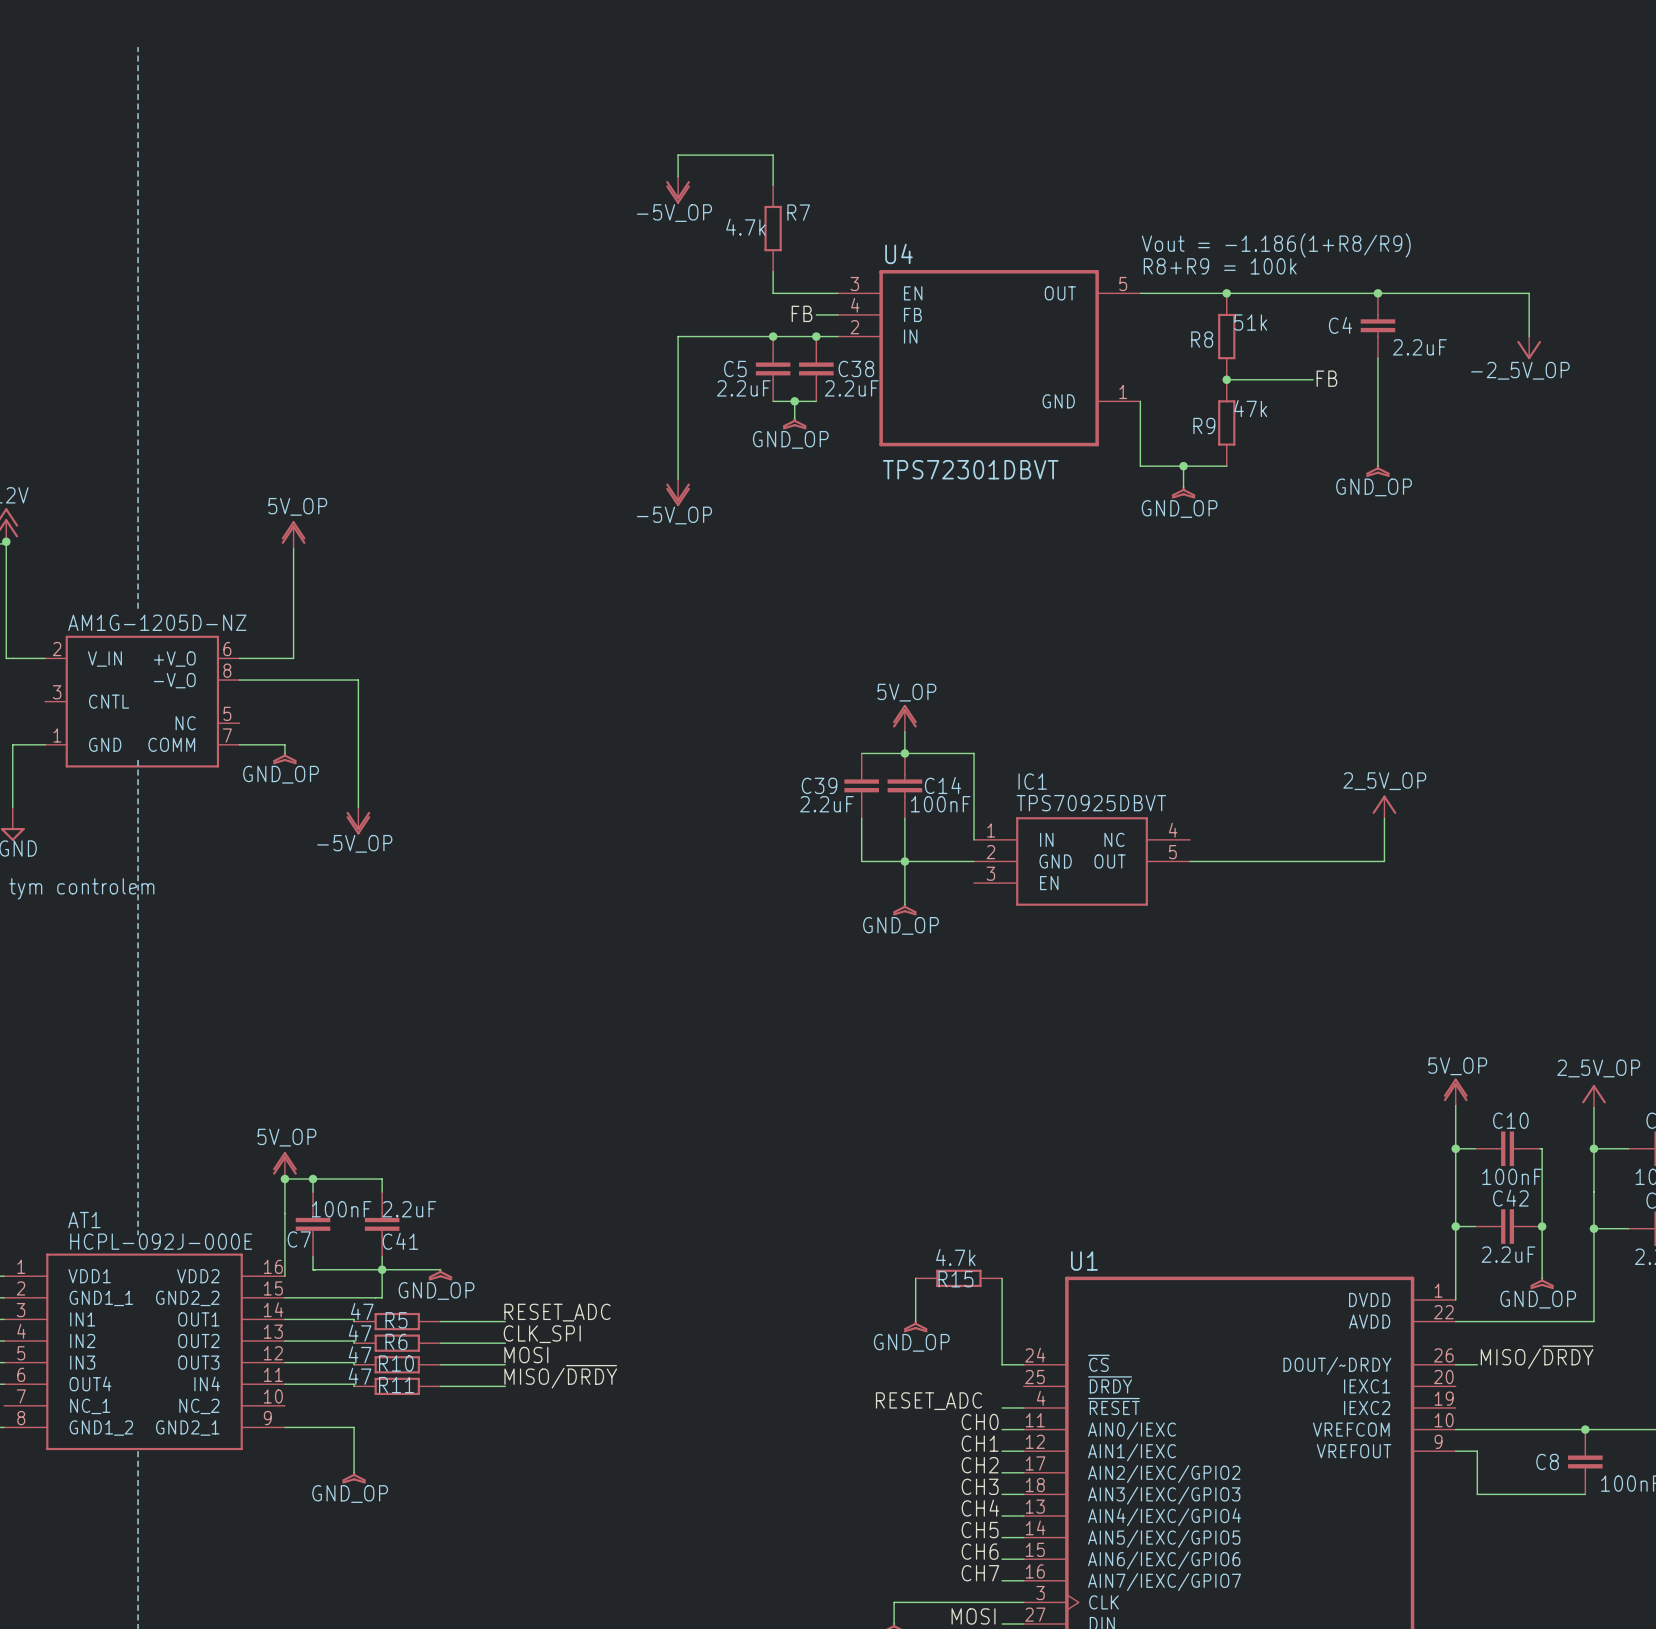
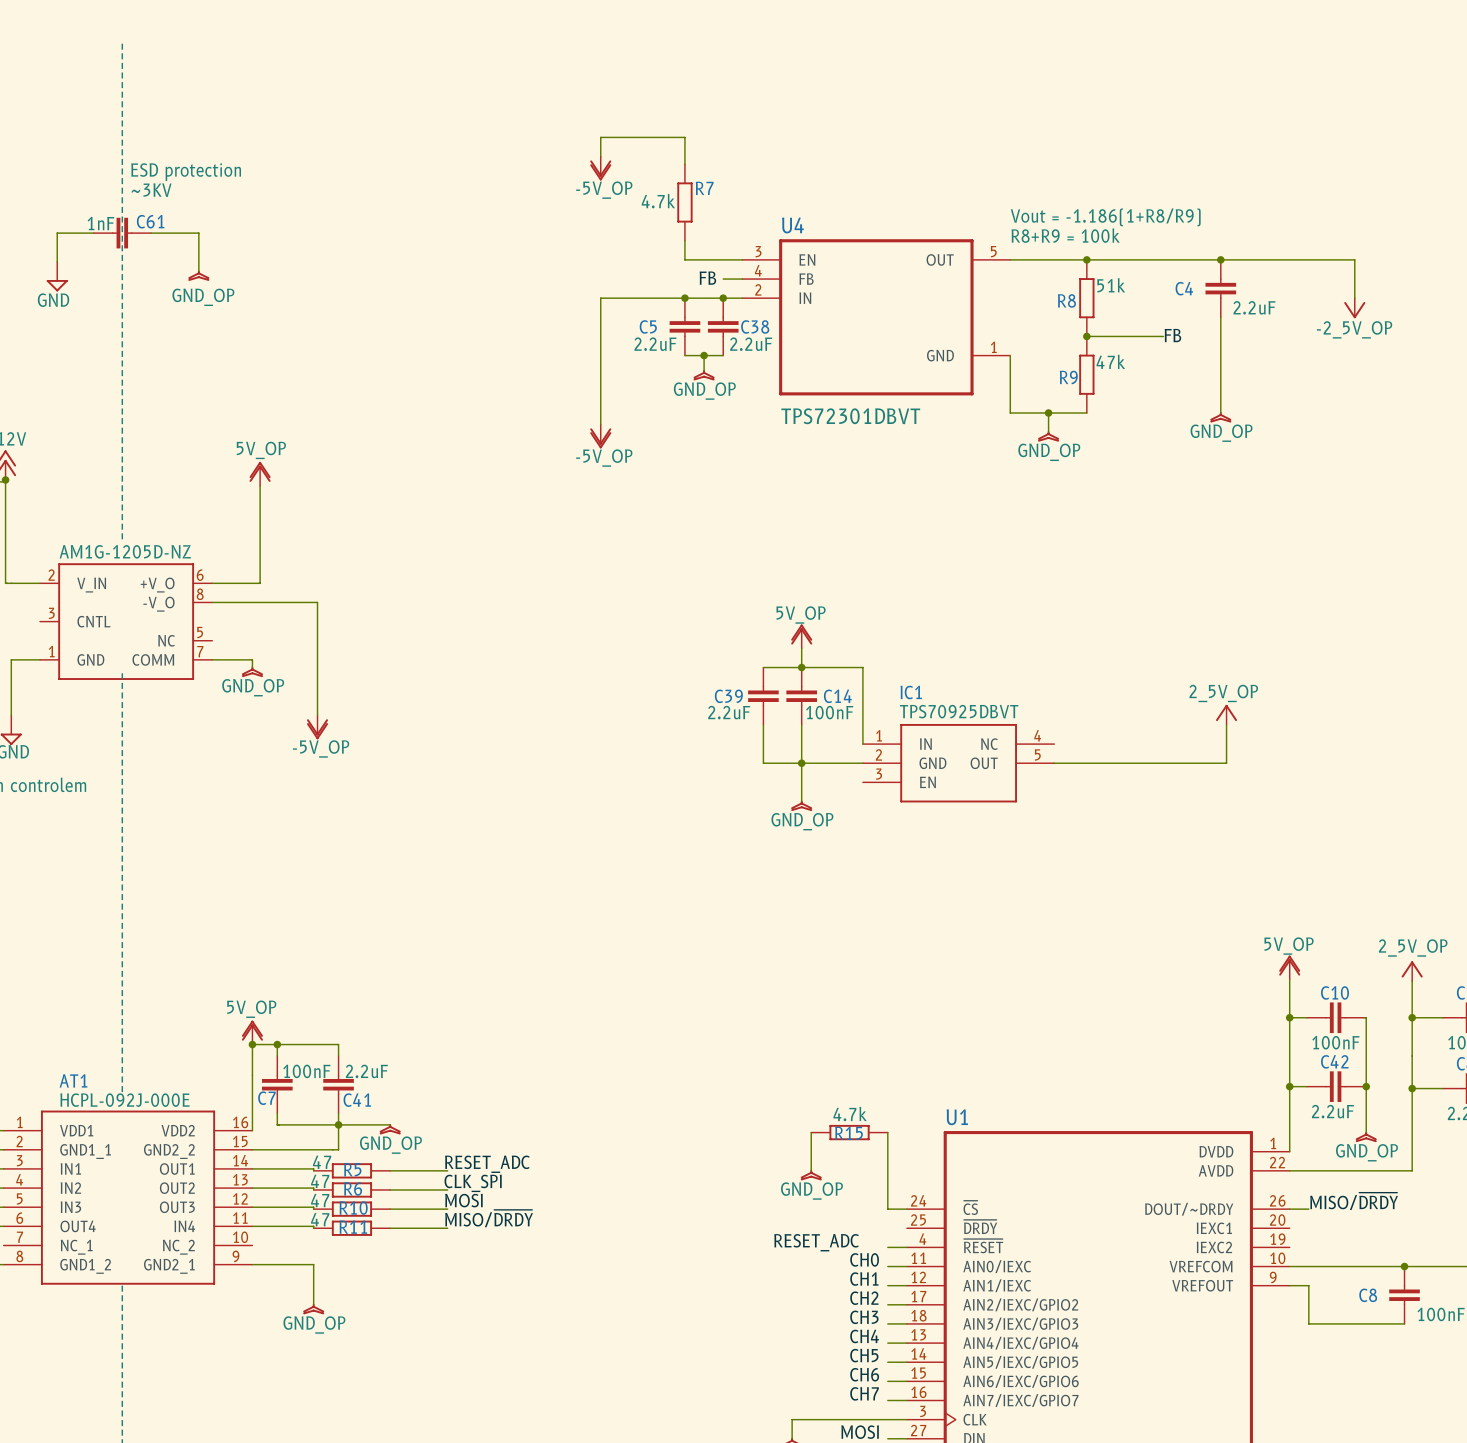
text: none -> ESD protection (186, 172)
text: none -> ~3KV (151, 190)
wire: none -> (93, 233) (57, 233) (57, 261)
C61: none -> 1nF (122, 233)
wire: none -> (151, 233) (198, 233) (198, 271)
power symbol: none -> GND_OP (198, 275)
power symbol: none -> GND (57, 276)

